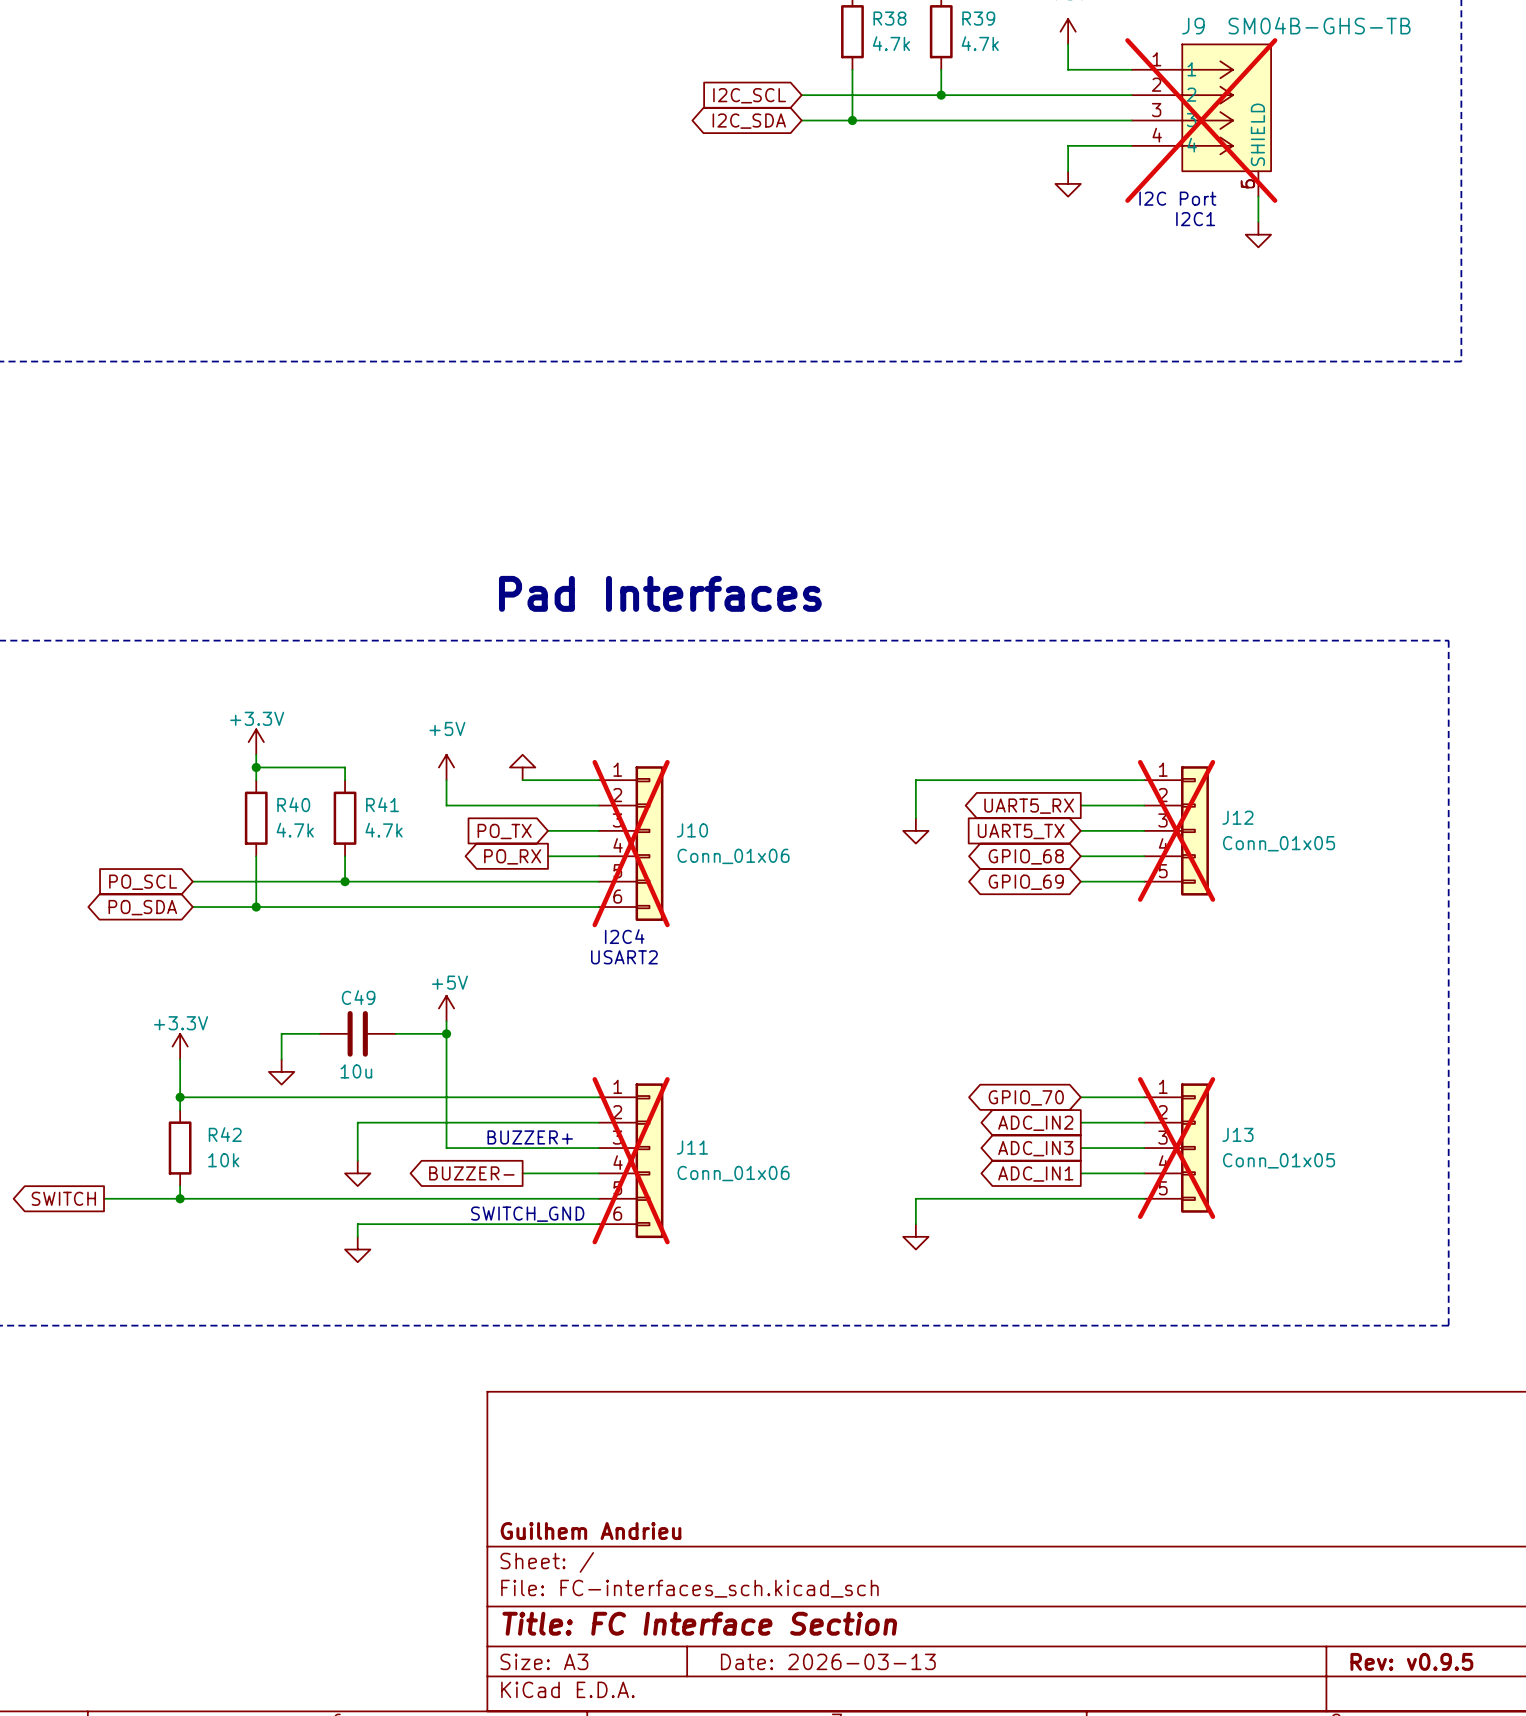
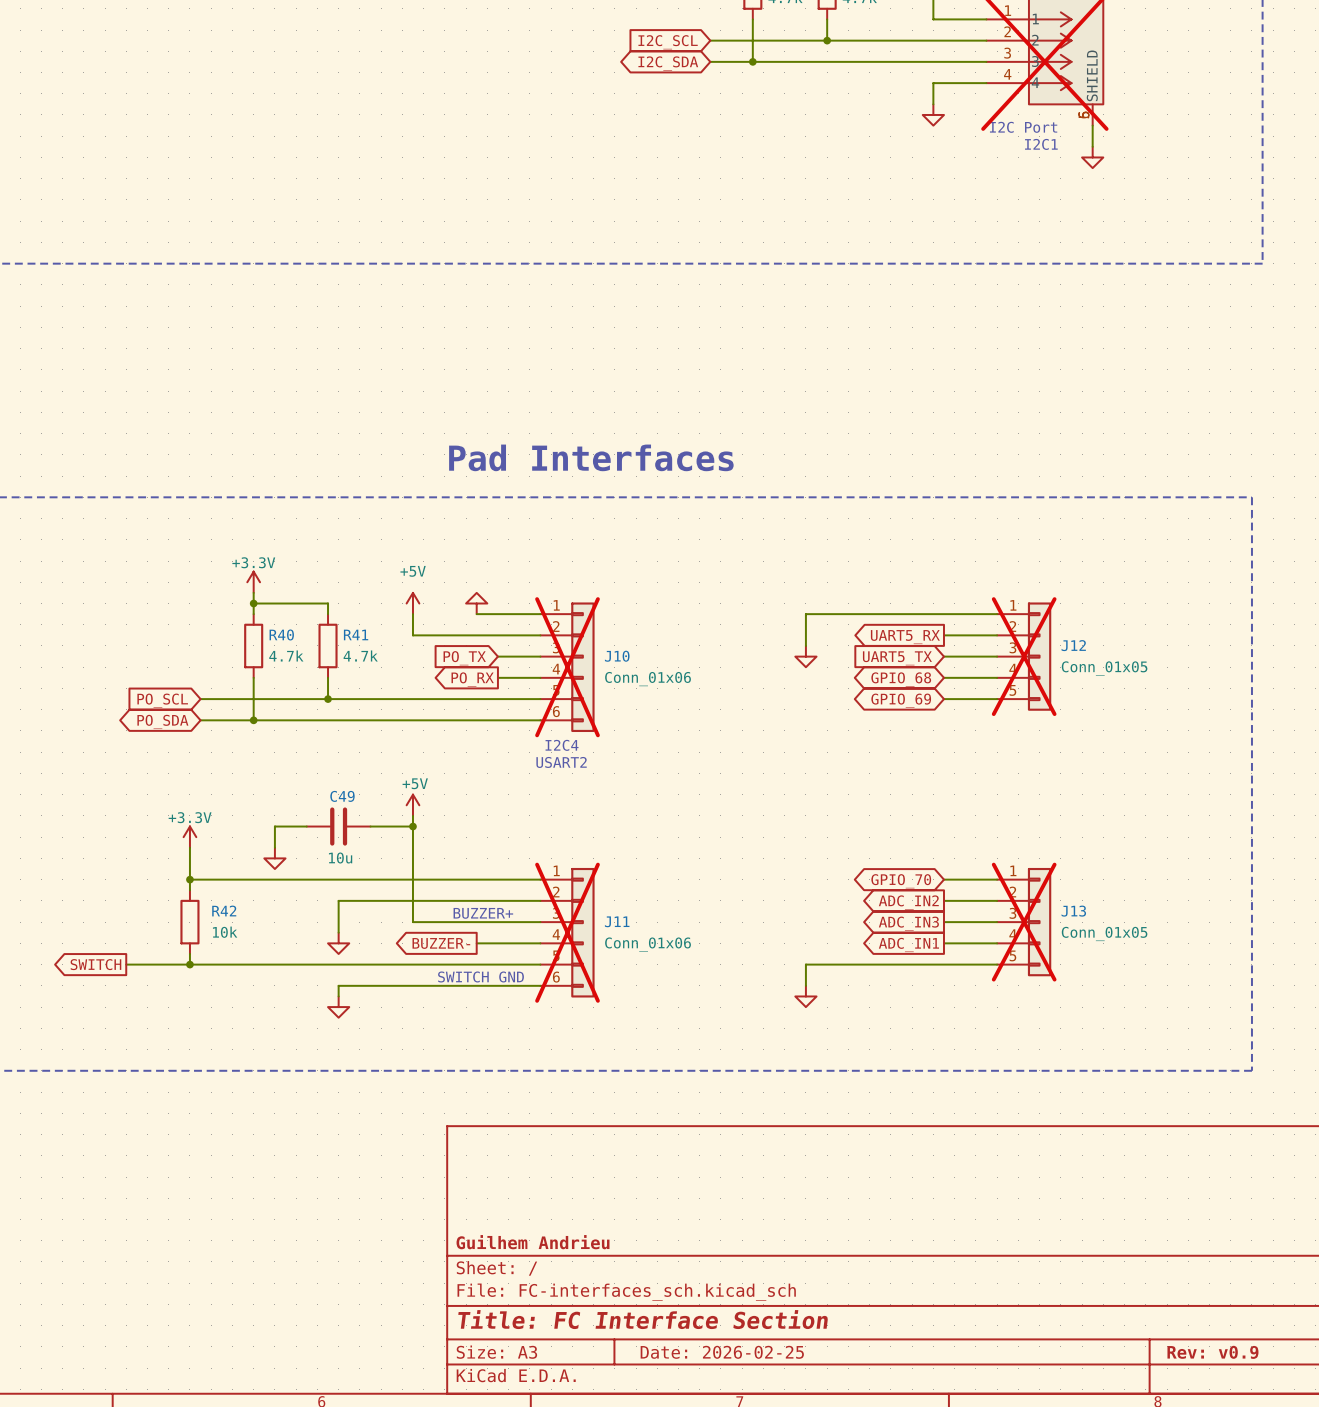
title block: Date: 2026-03-13 (828, 1661) -> Date: 2026-02-25 (722, 1352)
title block: Rev: v0.9.5 (1411, 1661) -> Rev: v0.9 (1212, 1352)

